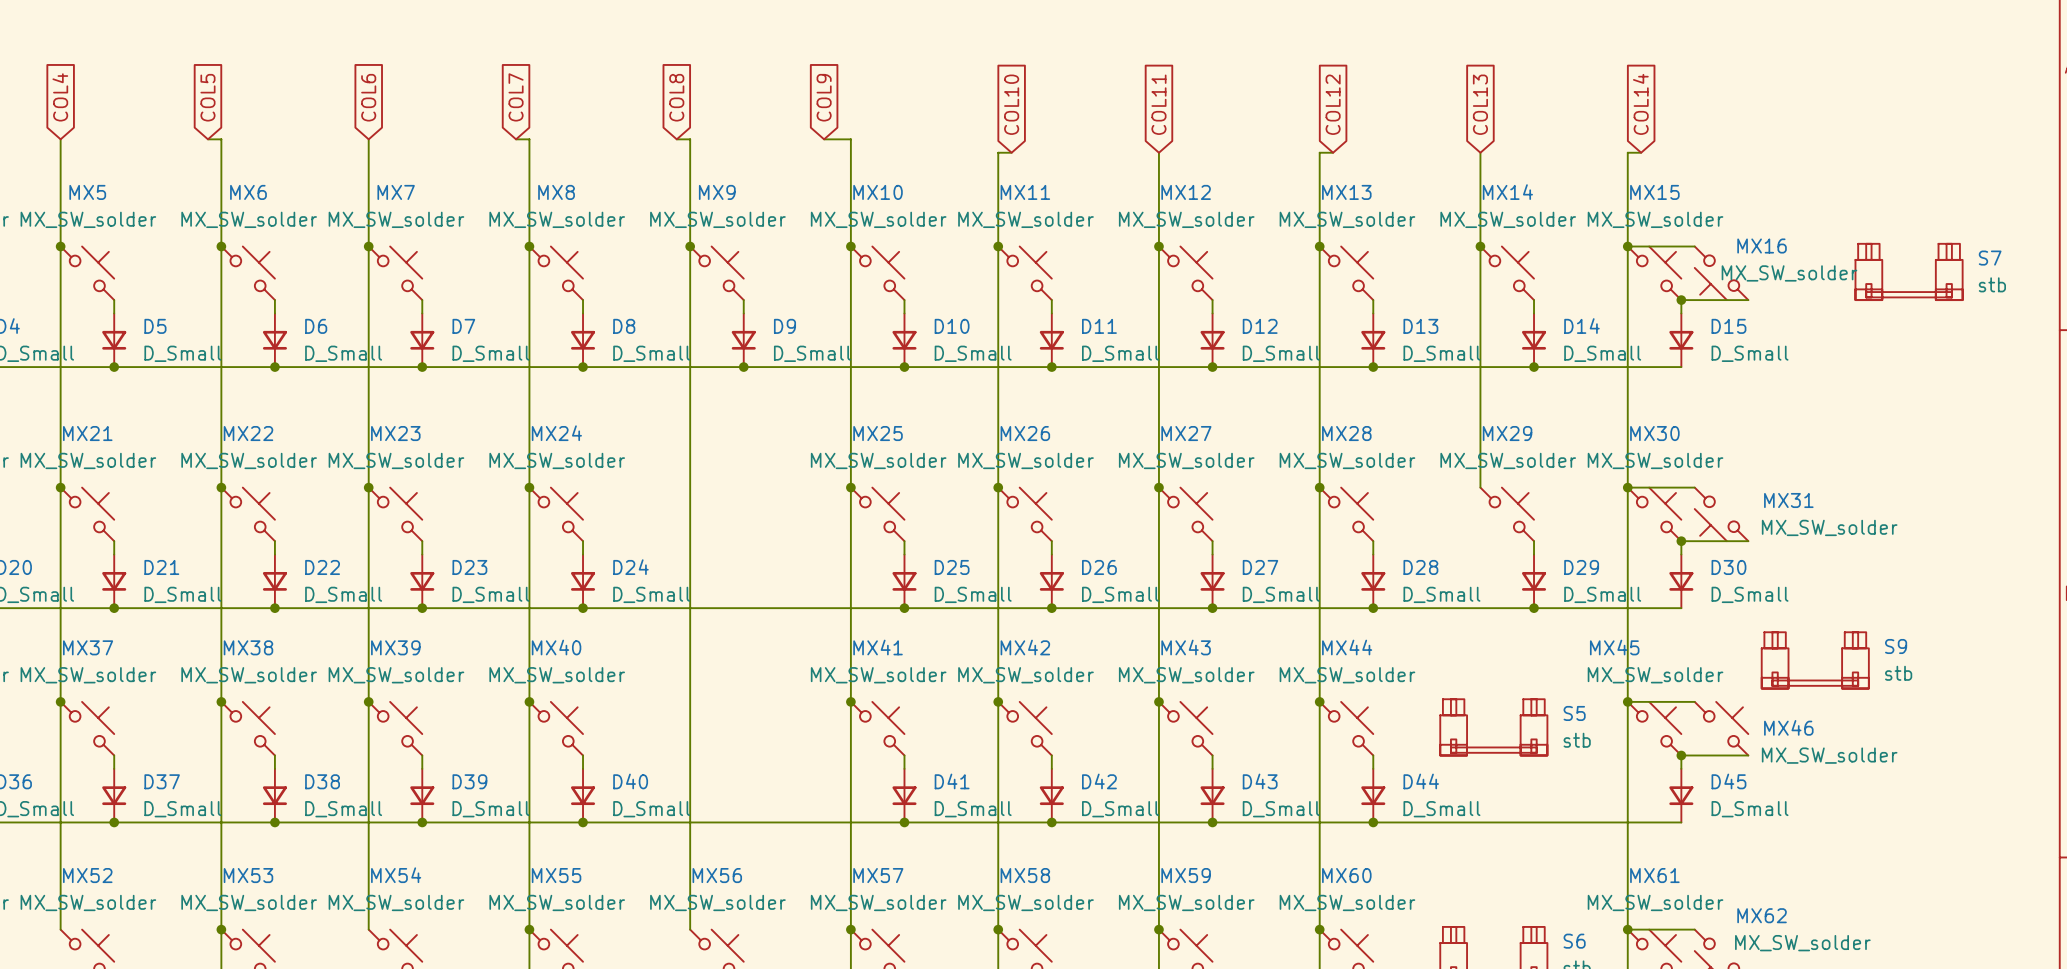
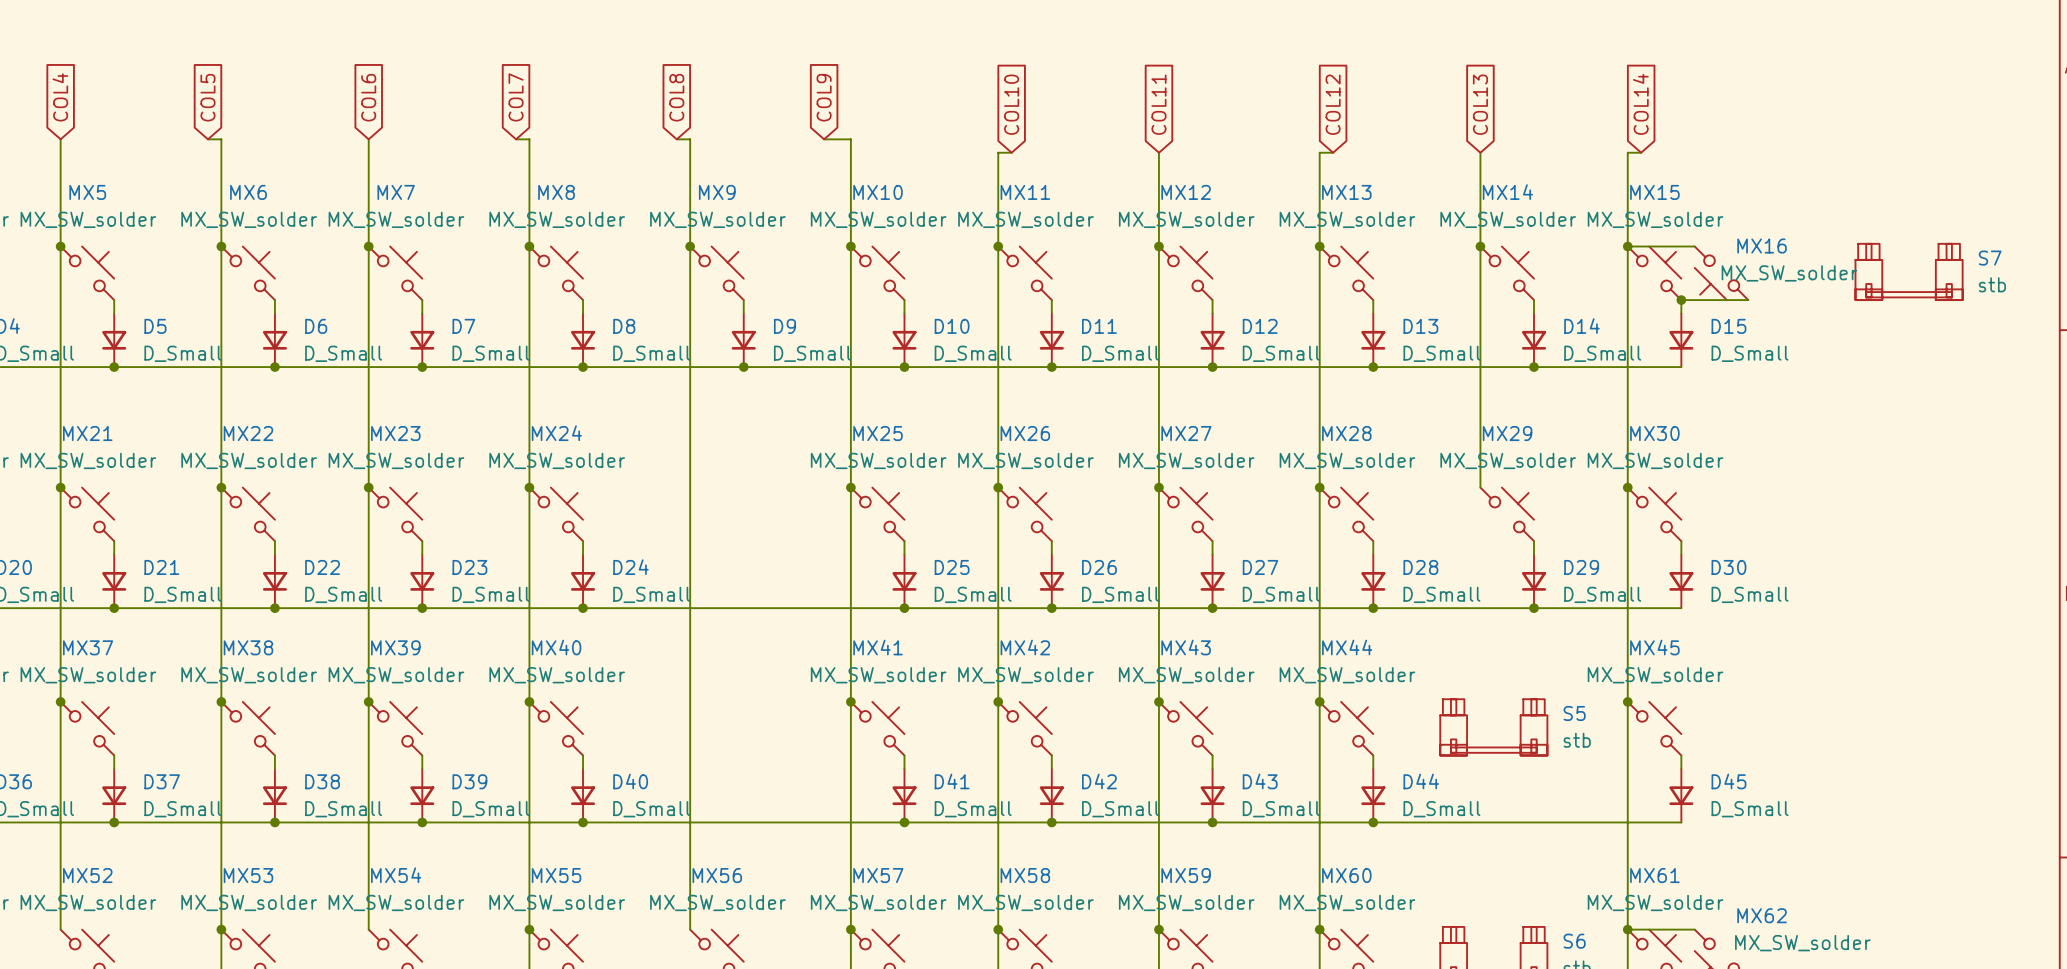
wire: (1627, 487) (1694, 487) -> none
MX31: MX_SW_solder (1721, 514) -> none
wire: (1681, 541) (1748, 541) -> none
junction: (1681, 541) -> none
MX45 name position: MX45 (1614, 647) -> MX45 (1654, 647)
S9: stb (1815, 660) -> none
wire: (1627, 701) (1694, 701) -> none
MX46: MX_SW_solder (1721, 728) -> none
wire: (1681, 755) (1748, 755) -> none
junction: (1681, 755) -> none

